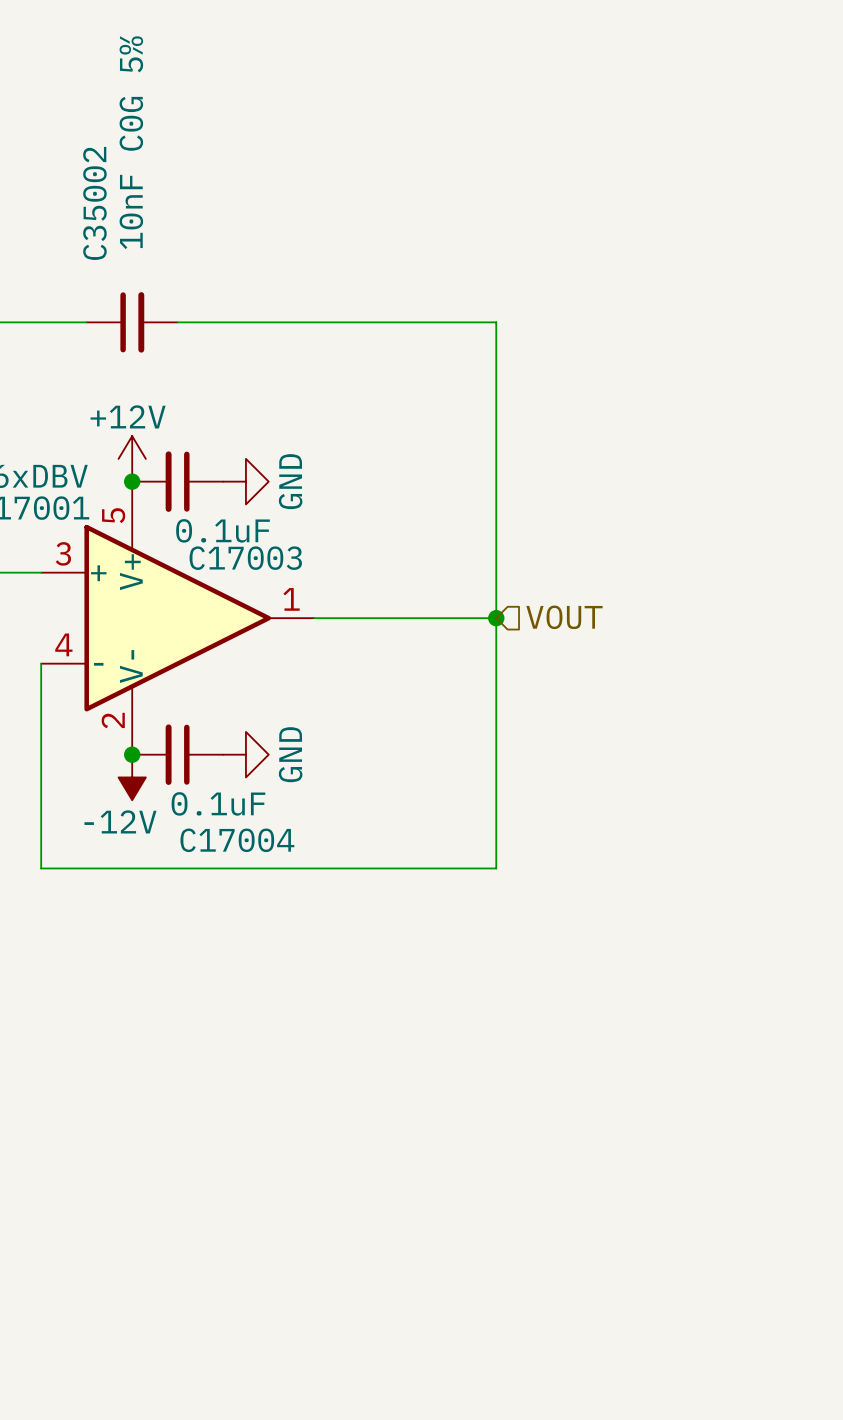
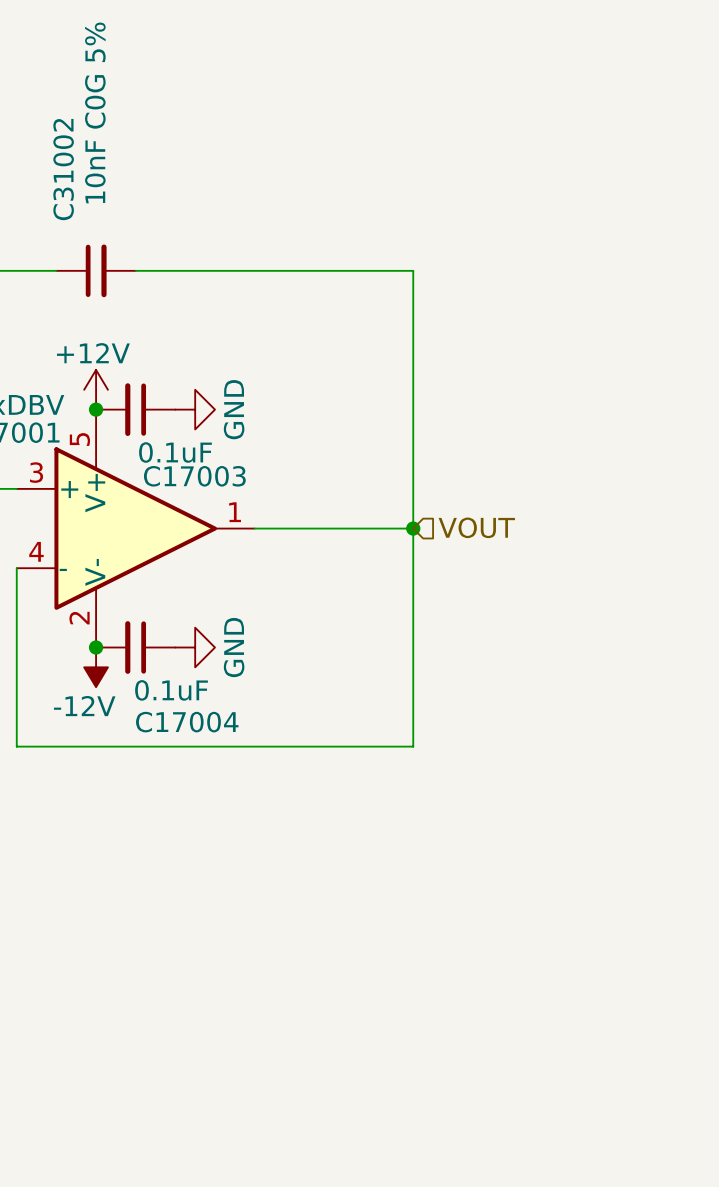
C35002 name: C35002 (94, 203) -> C31002 (63, 169)

